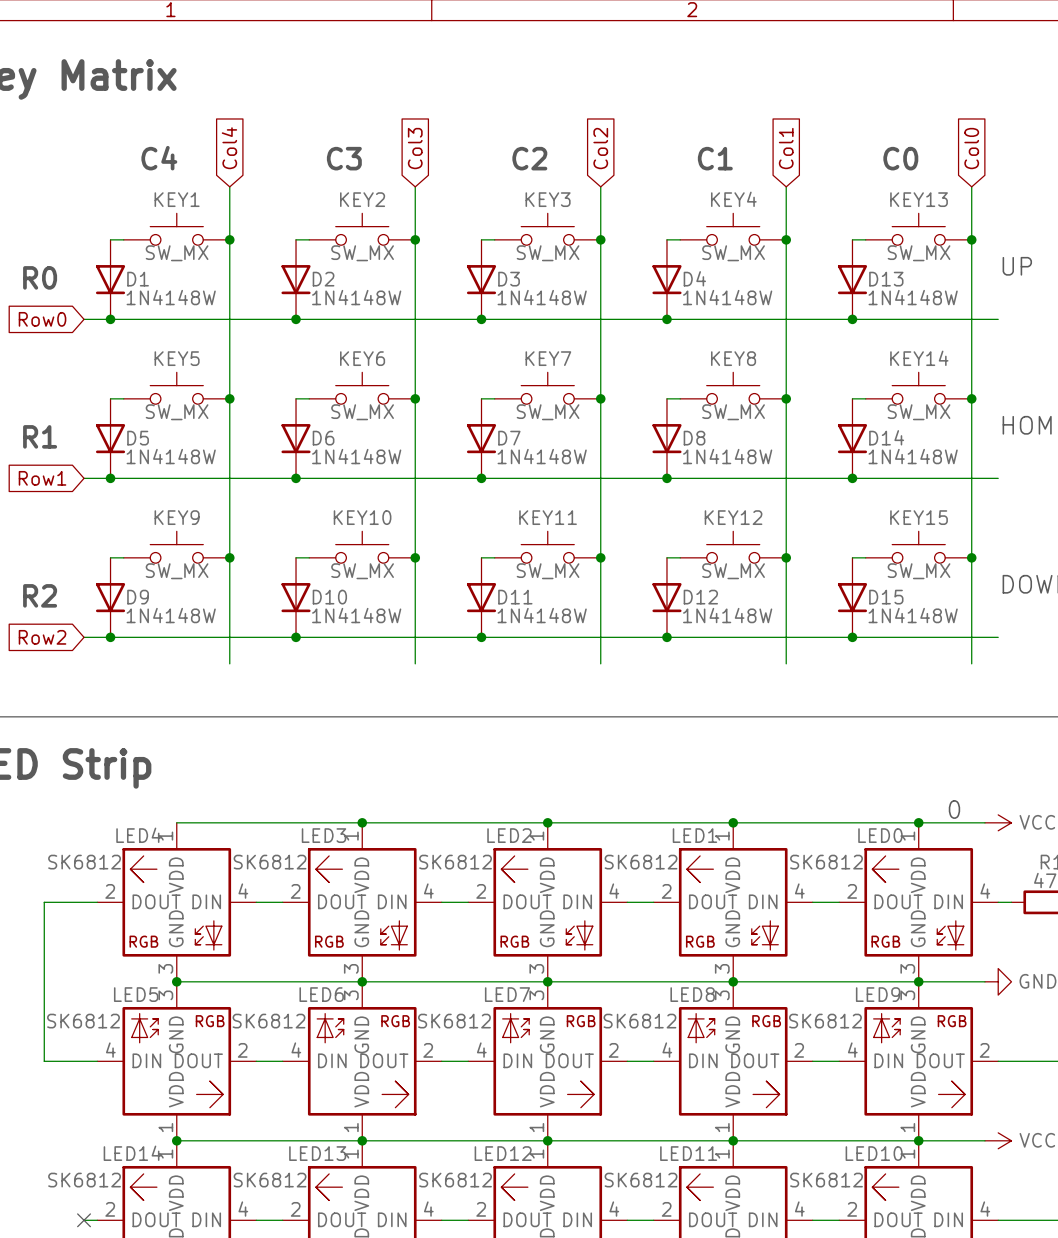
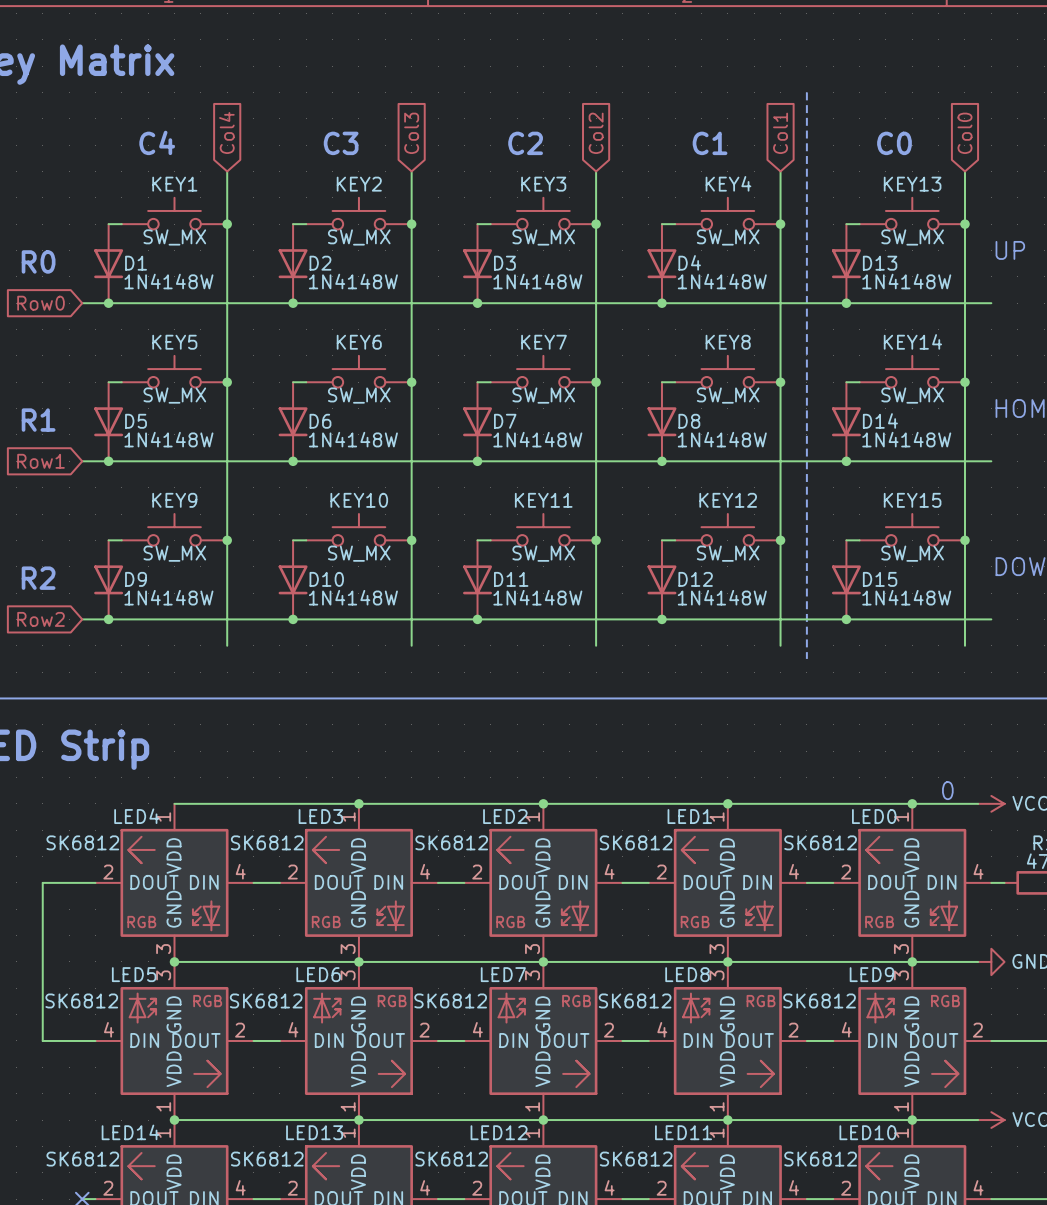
line: none -> (806, 92) (806, 658)

